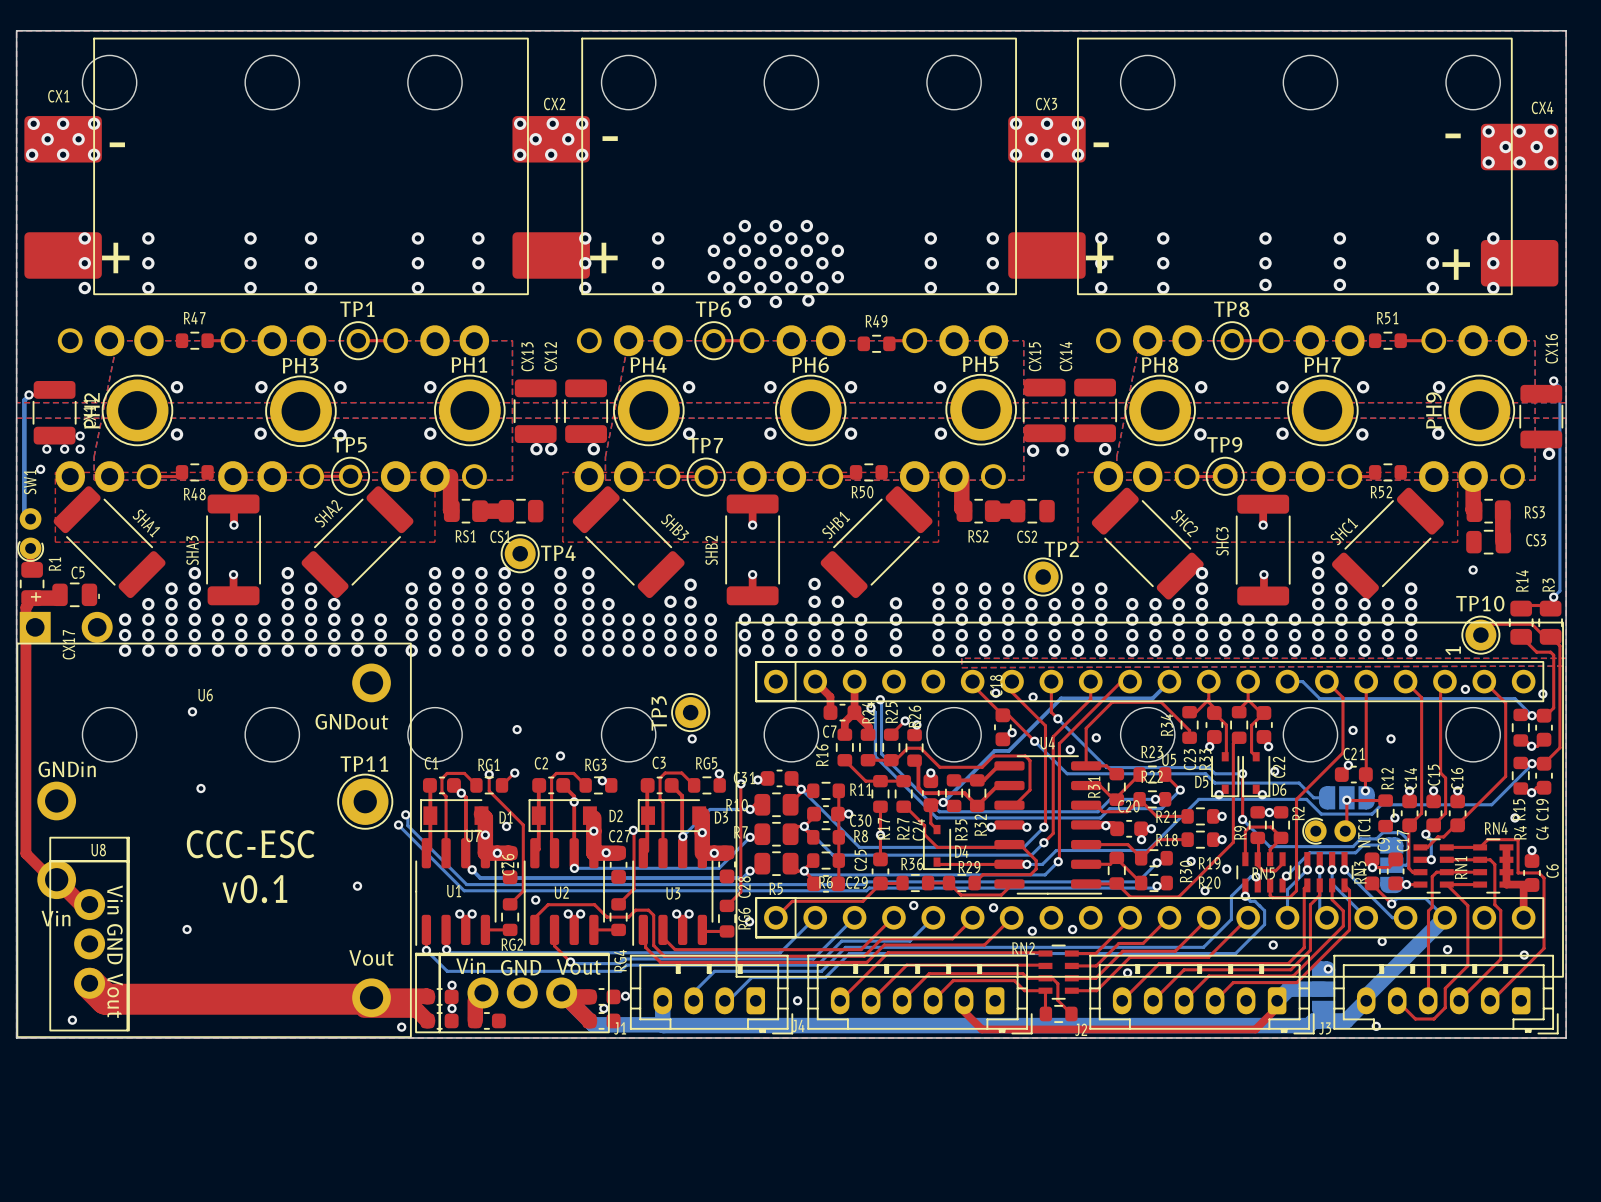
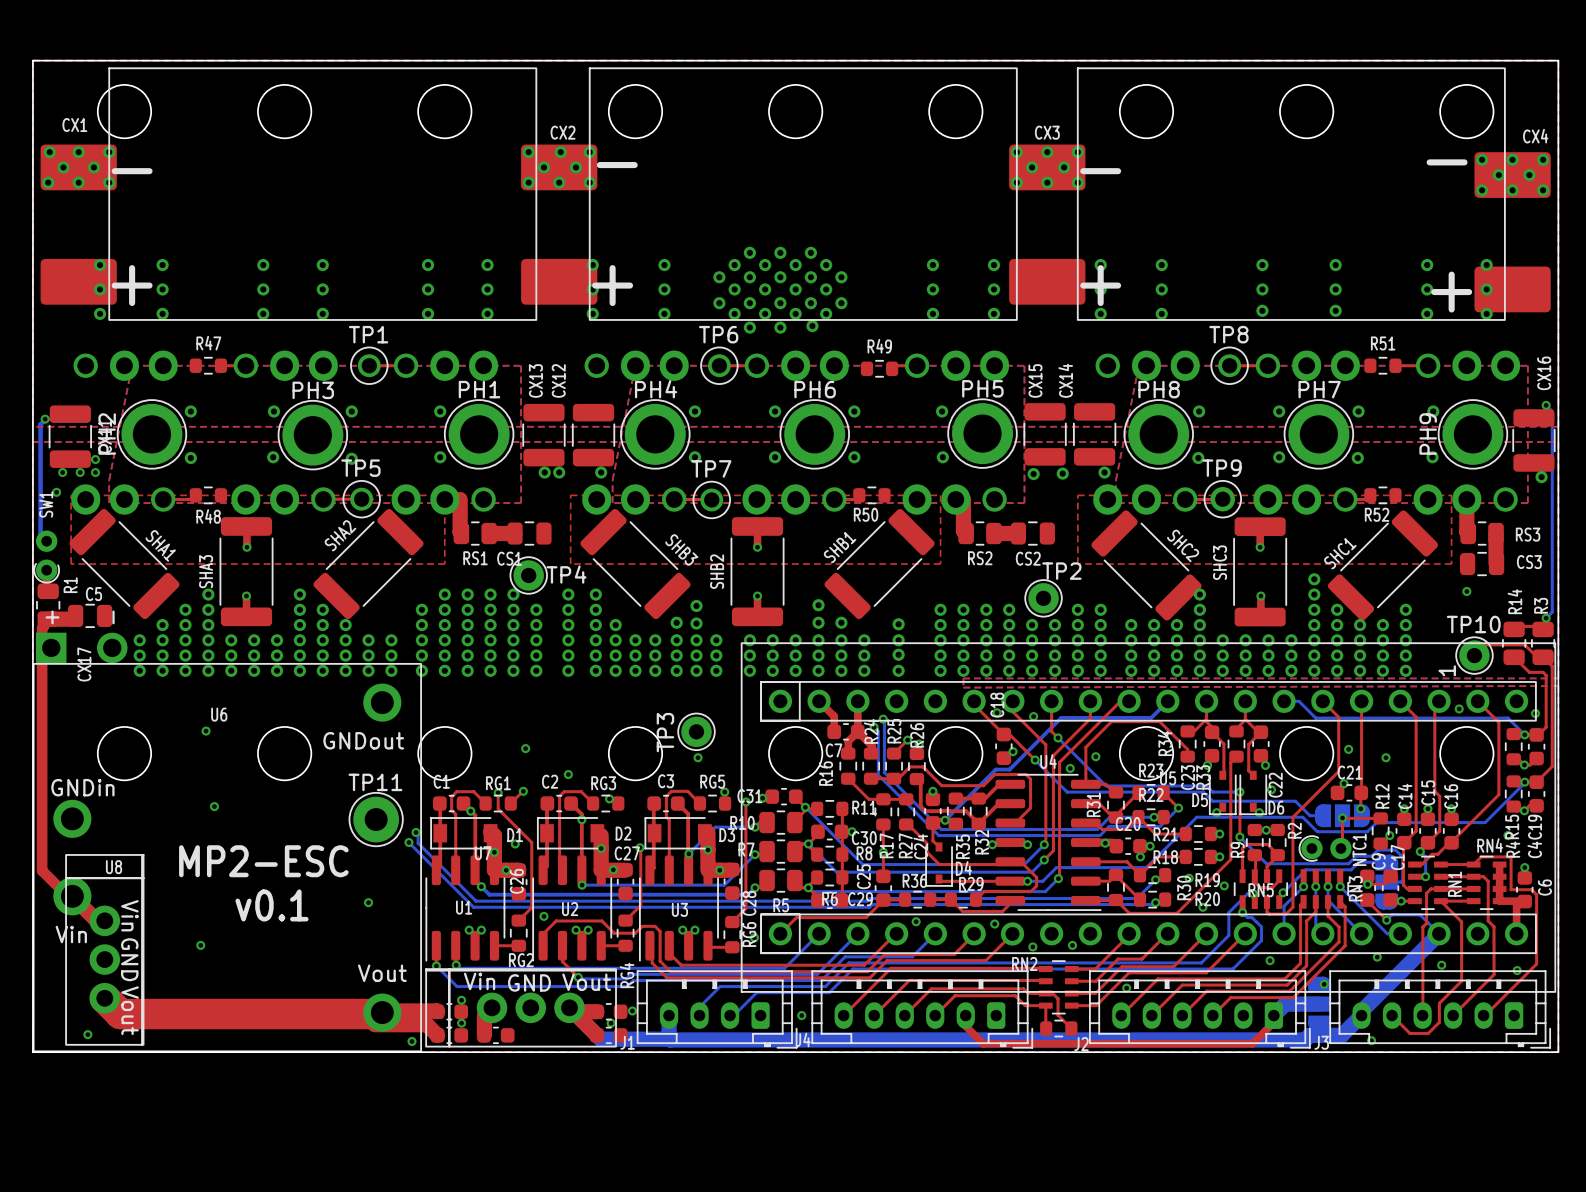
text: CCC-ESC (250, 844) -> MP2-ESC (263, 861)

